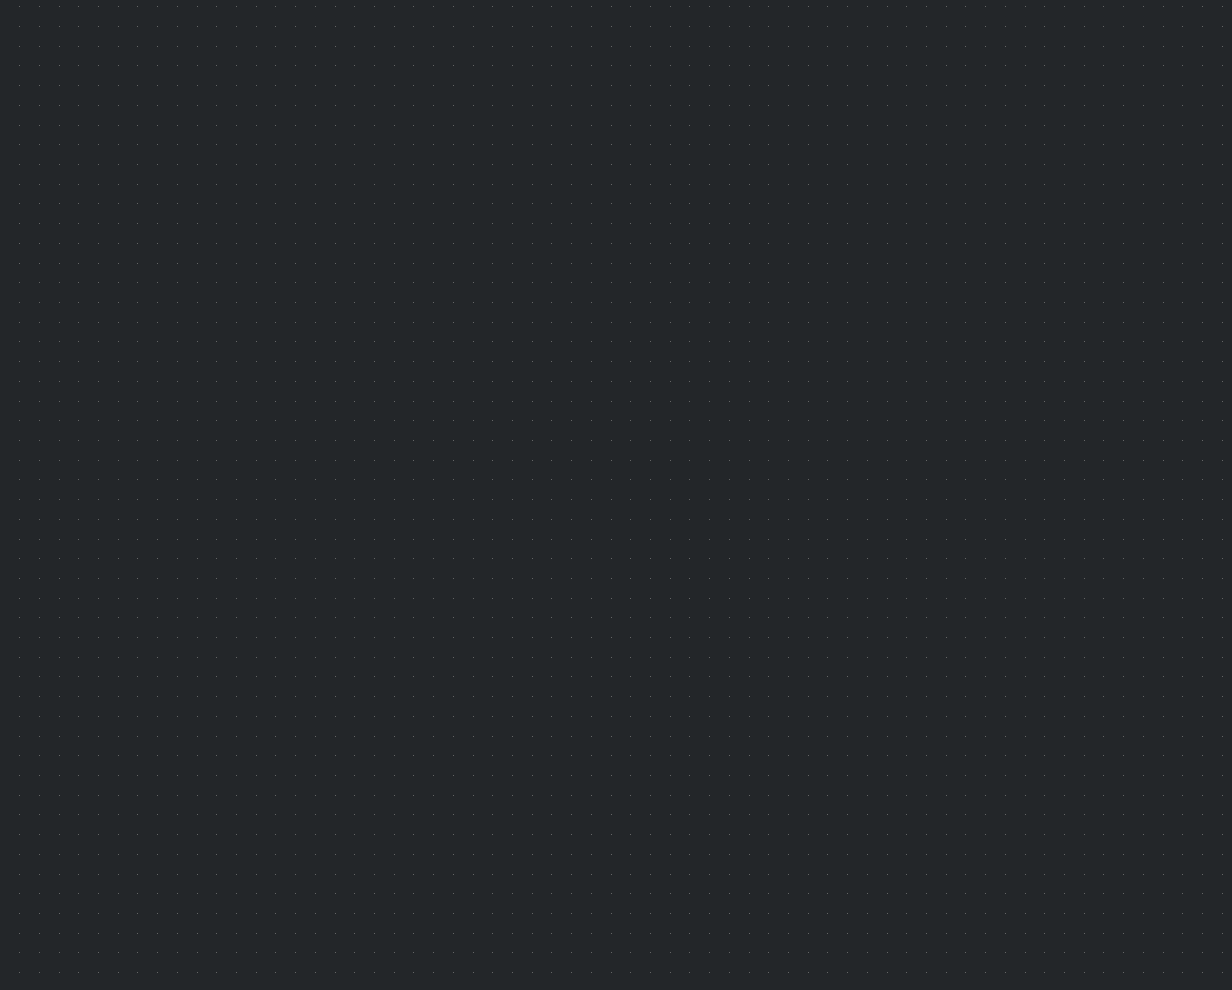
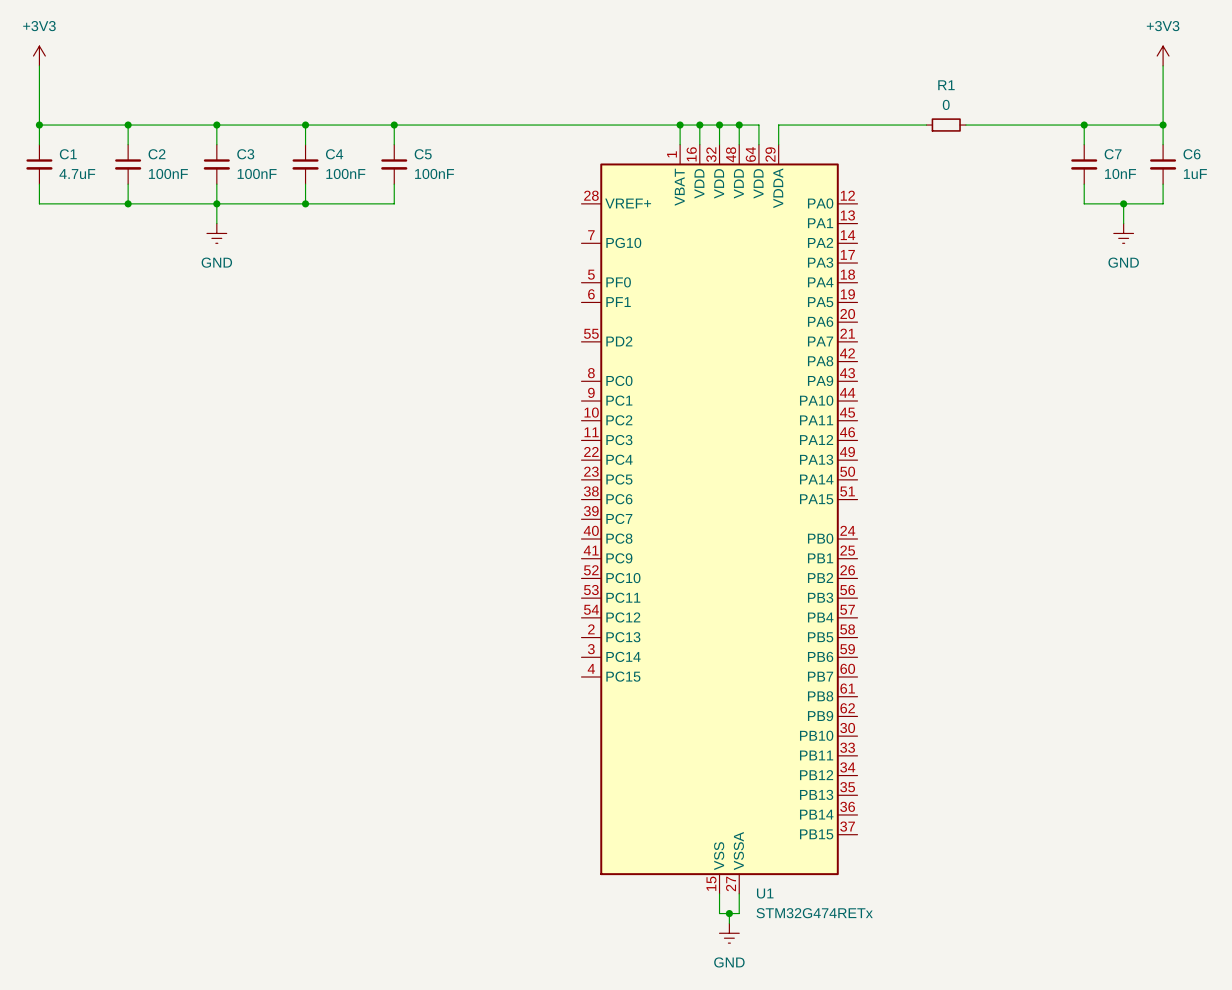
power symbol: none -> +3V3 (39, 56)
power symbol: none -> +3V3 (1163, 56)
wire: none -> (39, 65) (39, 144)
wire: none -> (1163, 65) (1163, 144)
wire: none -> (39, 125) (758, 125) (758, 144)
junction: none -> (39, 125)
wire: none -> (128, 125) (128, 144)
junction: none -> (128, 125)
wire: none -> (216, 125) (216, 144)
junction: none -> (216, 125)
wire: none -> (305, 125) (305, 144)
junction: none -> (305, 125)
wire: none -> (394, 125) (394, 144)
junction: none -> (394, 125)
wire: none -> (680, 125) (680, 144)
junction: none -> (680, 125)
wire: none -> (699, 125) (699, 144)
junction: none -> (699, 125)
wire: none -> (719, 125) (719, 144)
junction: none -> (719, 125)
wire: none -> (739, 125) (739, 144)
junction: none -> (739, 125)
wire: none -> (926, 125) (778, 125) (778, 144)
R1: none -> 0 (946, 125)
wire: none -> (965, 125) (1163, 125)
wire: none -> (1084, 125) (1084, 144)
junction: none -> (1084, 125)
junction: none -> (1163, 125)
C1: none -> 4.7uF (39, 164)
C2: none -> 100nF (128, 164)
C3: none -> 100nF (216, 164)
C4: none -> 100nF (305, 164)
C5: none -> 100nF (394, 164)
C7: none -> 10nF (1084, 164)
C6: none -> 1uF (1163, 164)
wire: none -> (39, 184) (39, 203) (394, 203) (394, 184)
wire: none -> (128, 184) (128, 203)
wire: none -> (216, 184) (216, 223)
wire: none -> (305, 184) (305, 203)
wire: none -> (1084, 184) (1084, 203) (1163, 203) (1163, 184)
junction: none -> (128, 203)
junction: none -> (216, 203)
junction: none -> (305, 203)
wire: none -> (1123, 203) (1123, 223)
junction: none -> (1123, 203)
power symbol: none -> GND (216, 233)
power symbol: none -> GND (1123, 233)
U1: none -> STM32G474RETx (719, 519)
wire: none -> (719, 893) (719, 913) (739, 913) (739, 893)
wire: none -> (729, 913) (729, 923)
junction: none -> (729, 913)
power symbol: none -> GND (729, 933)

